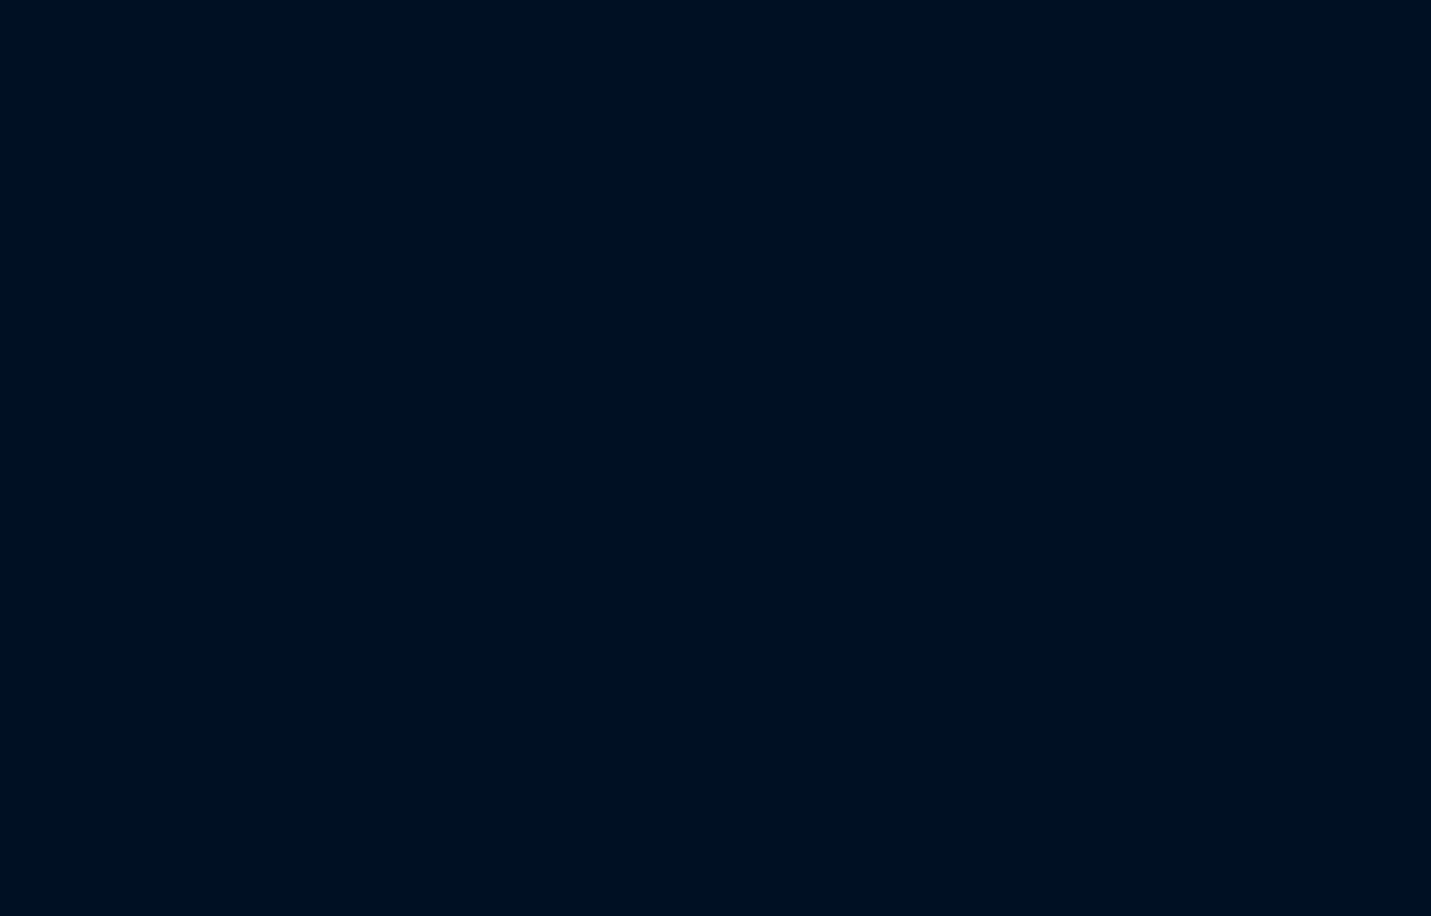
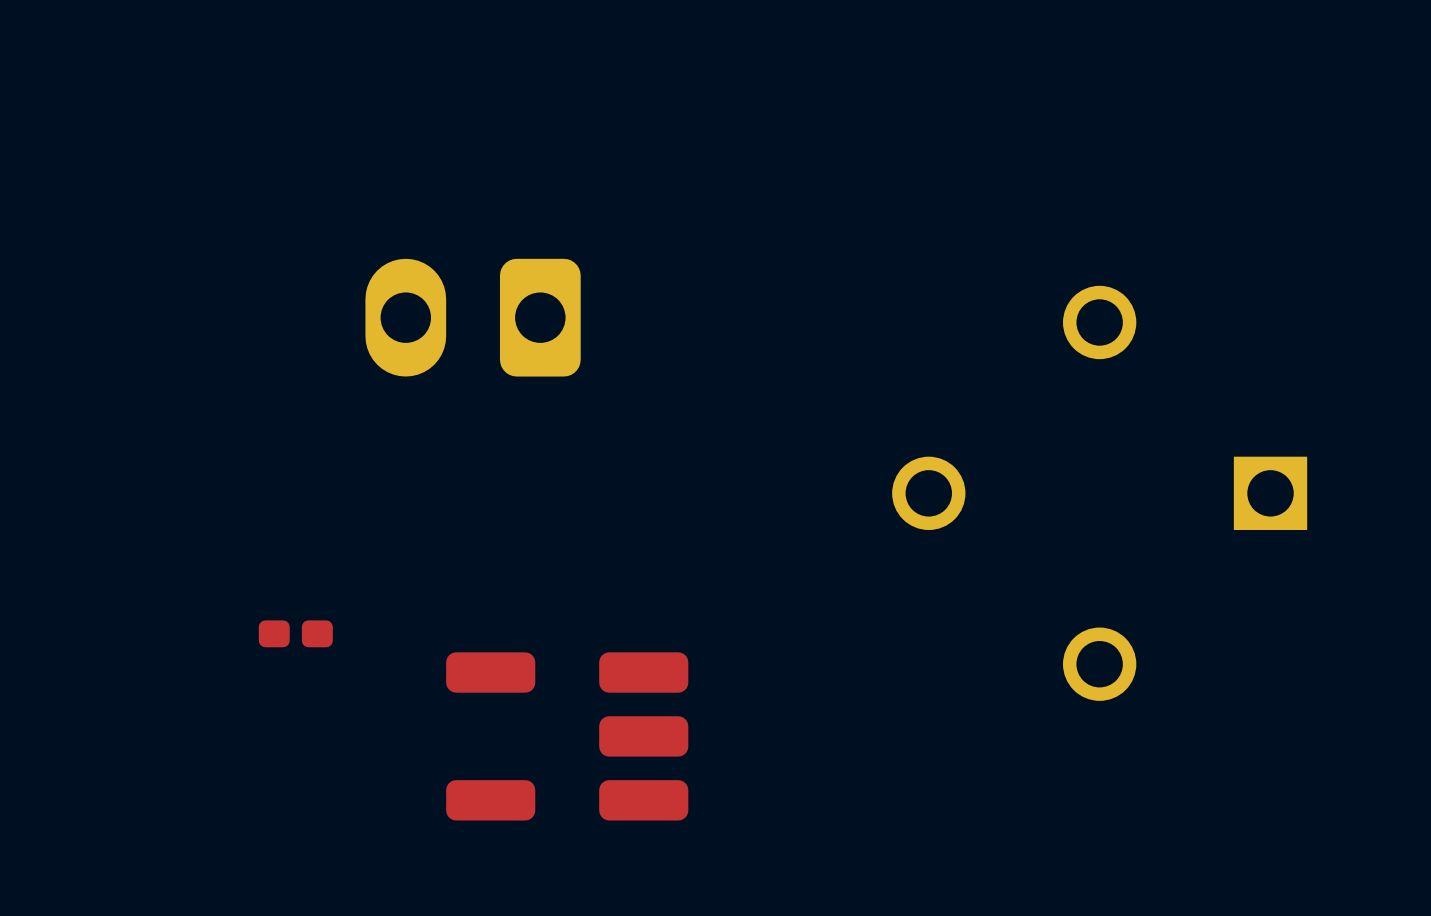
part: none -> (473, 317)
part: none -> (1099, 493)
part: none -> (295, 633)
part: none -> (567, 736)

